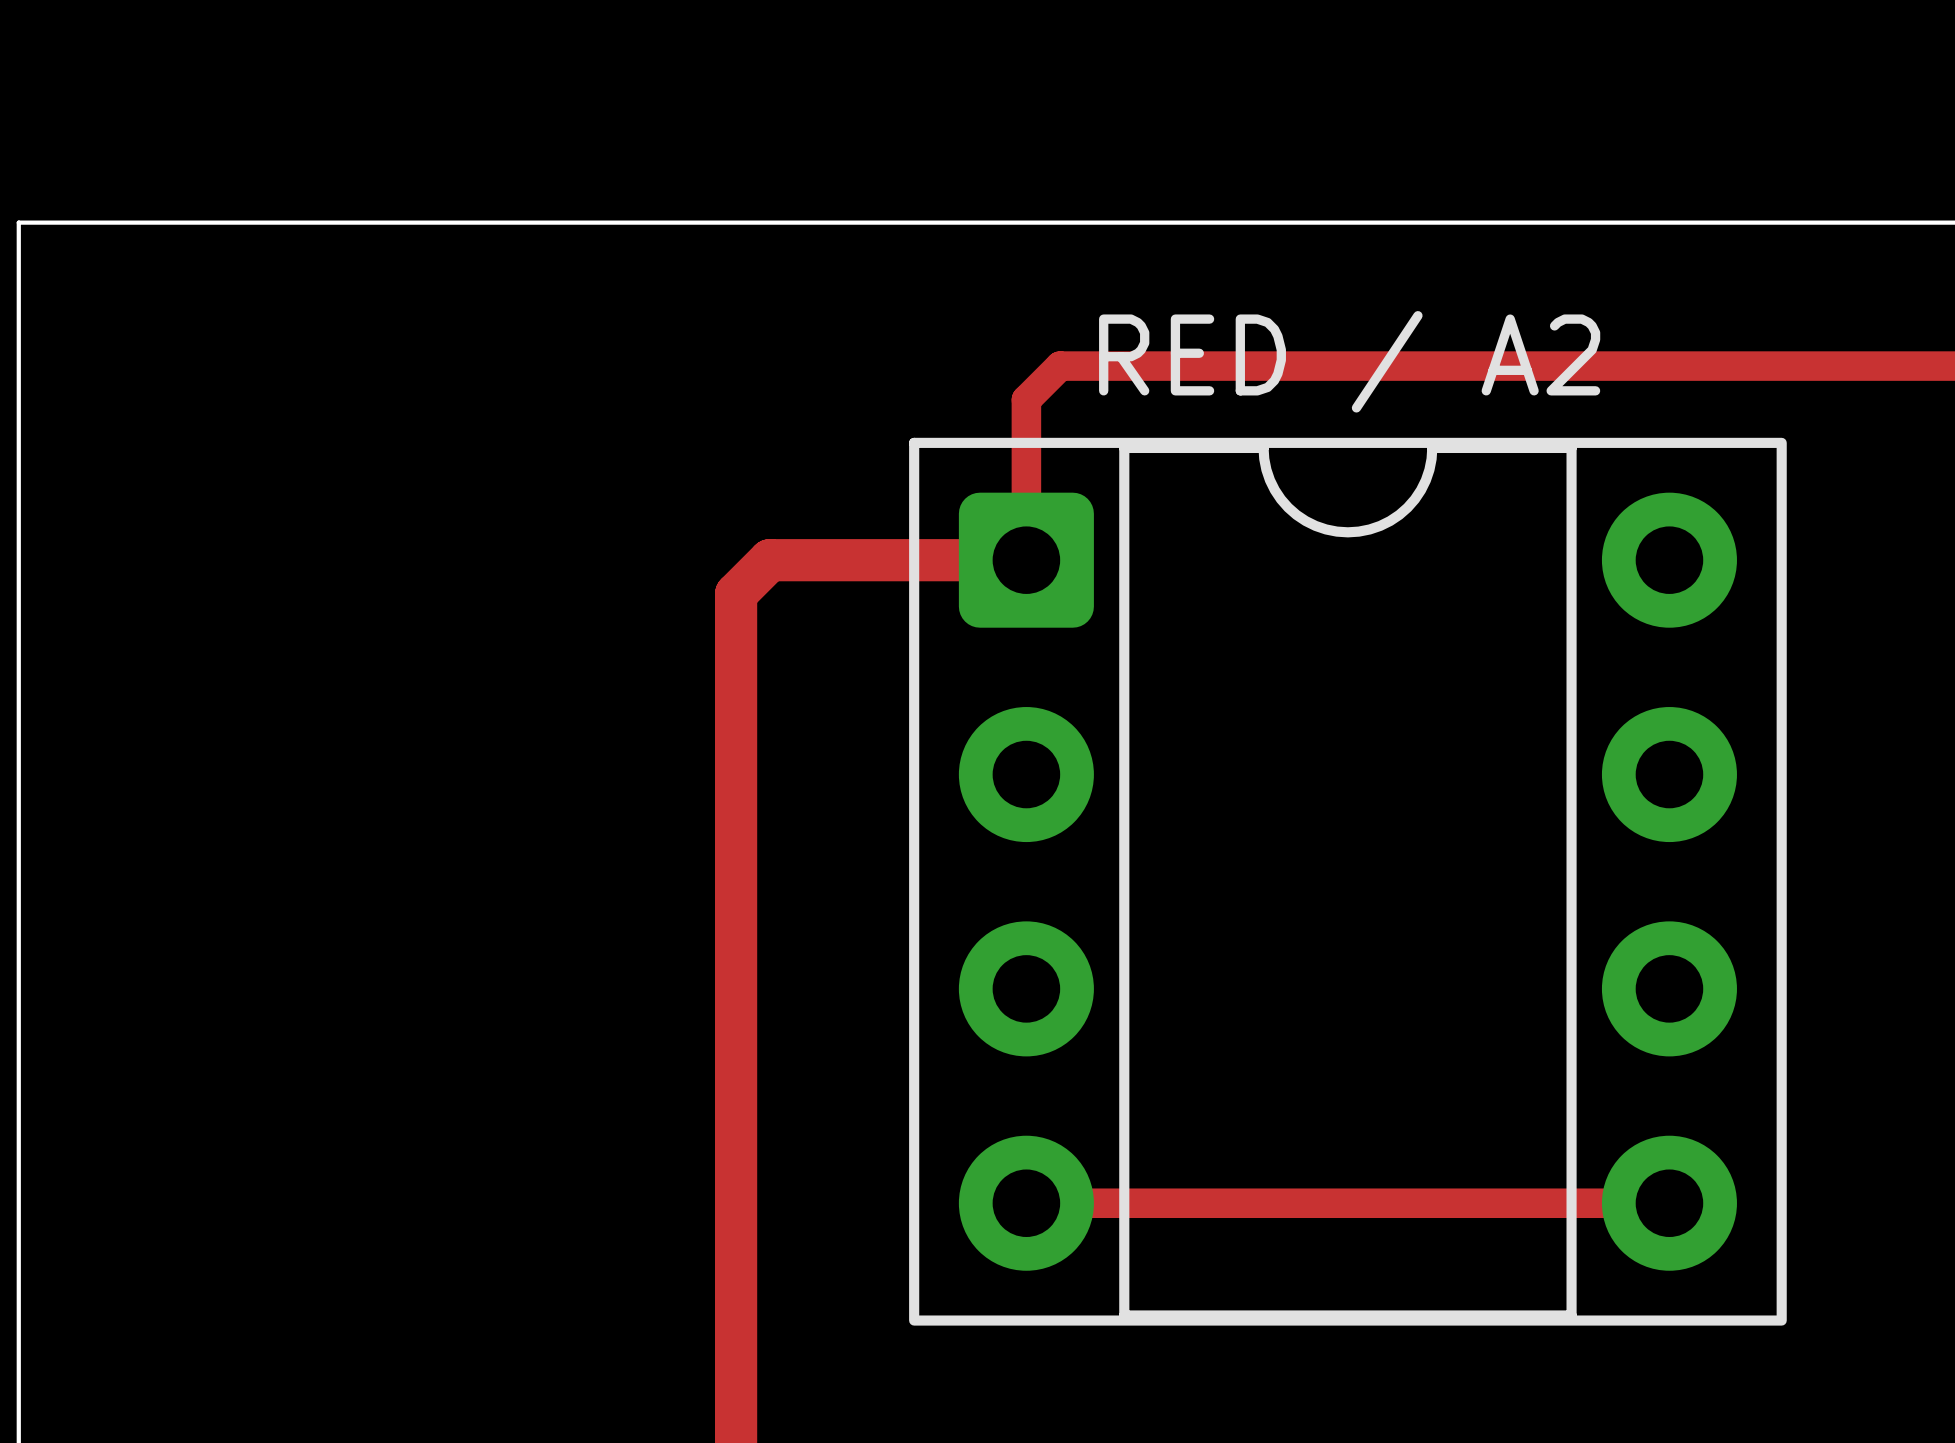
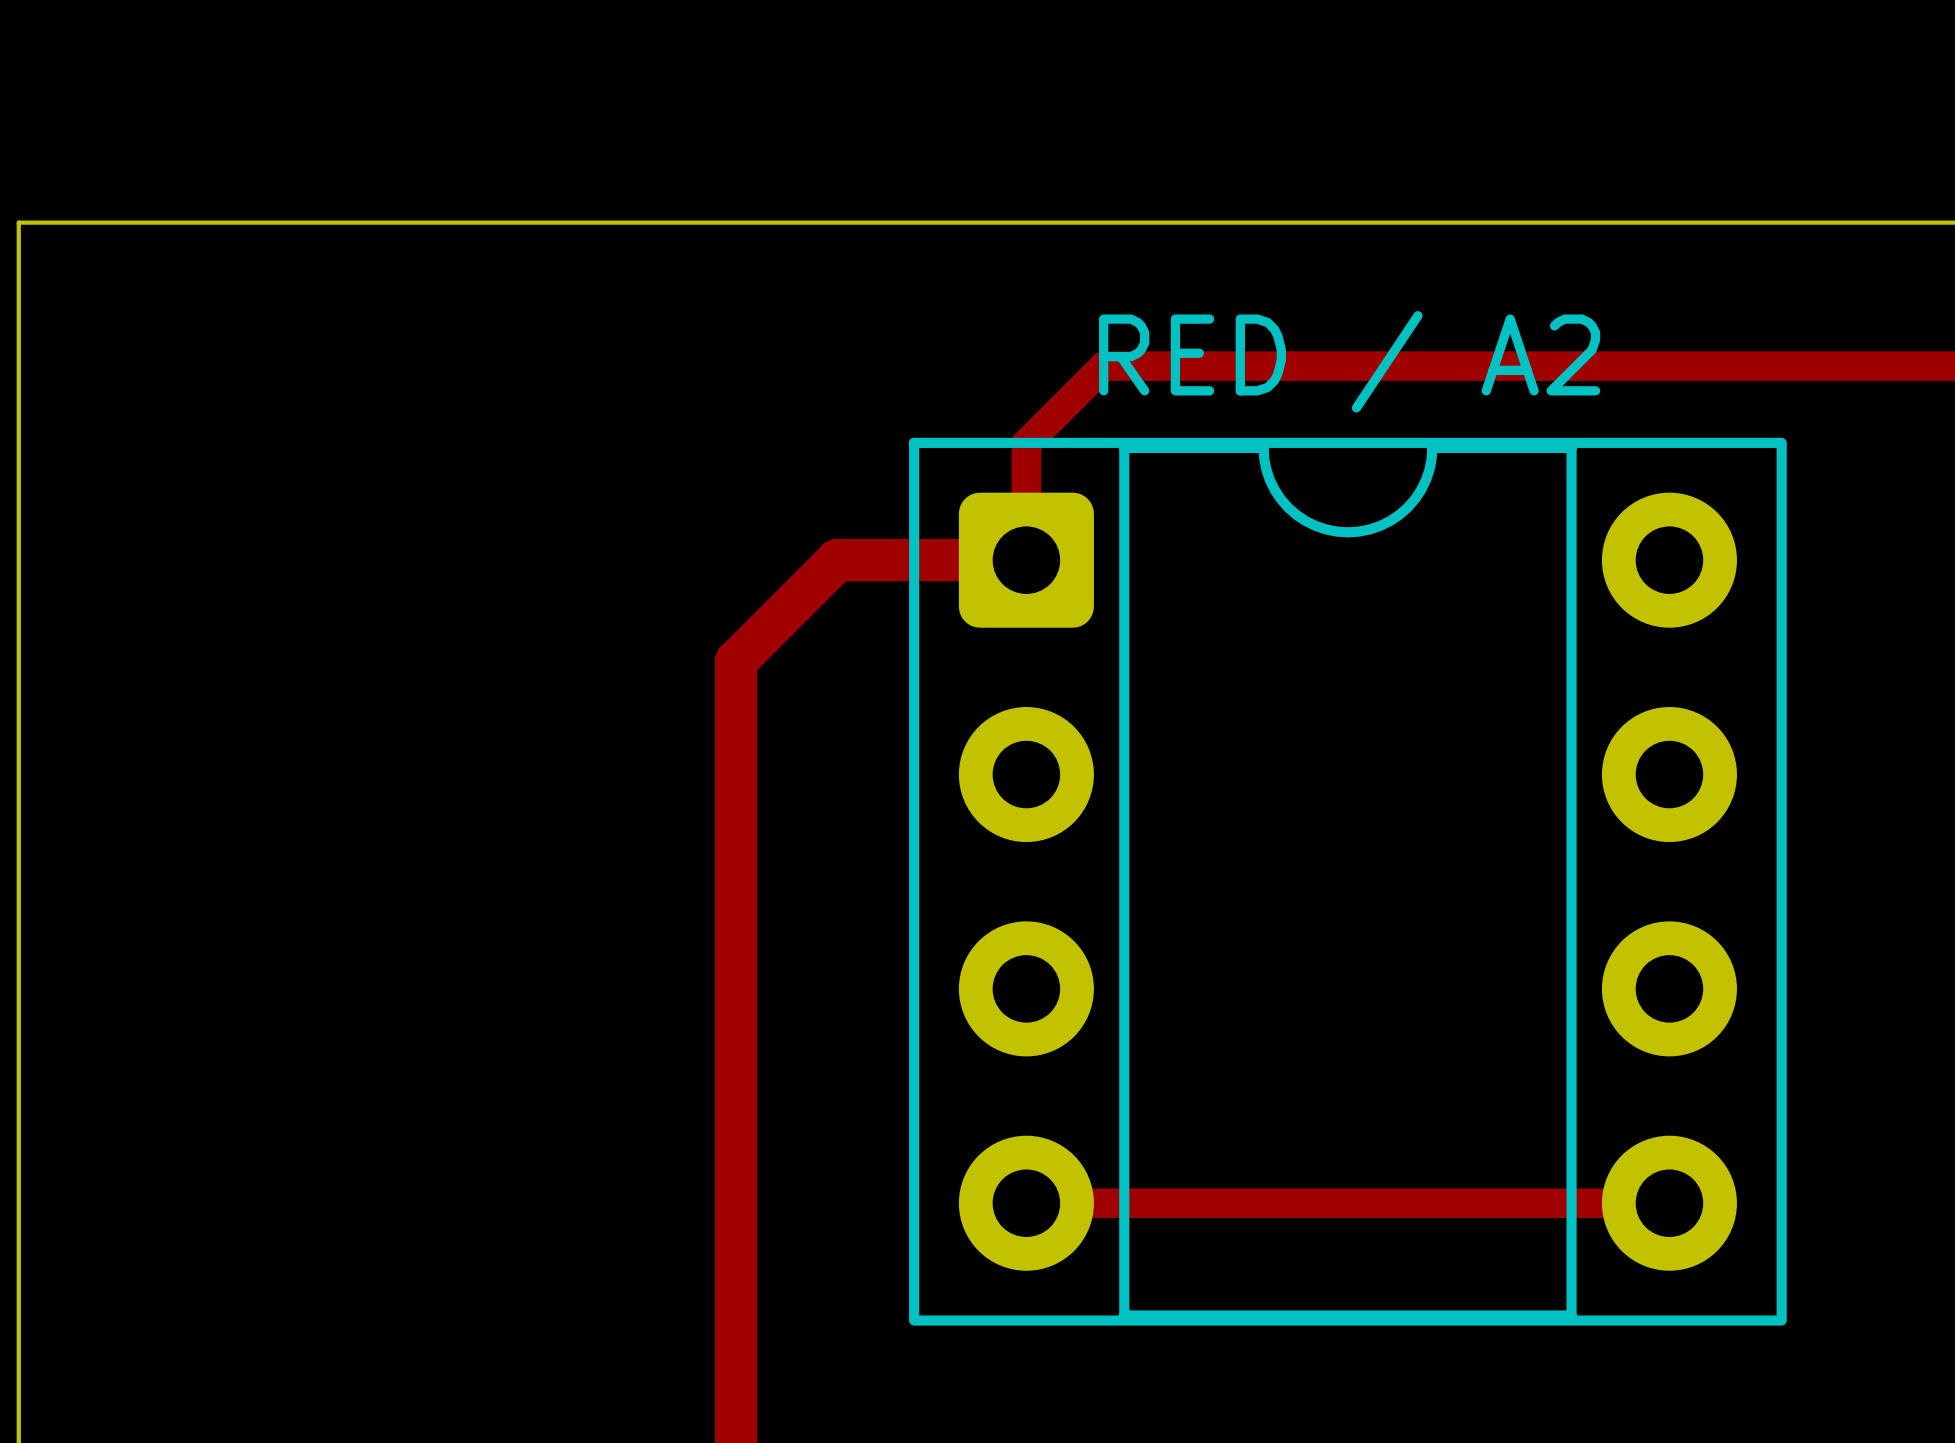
track: (1104, 366) (1060, 366) (1026, 399) (1026, 443) -> (1104, 366) (1026, 443)
track: (837, 560) (769, 560) (736, 593) (736, 661) -> (837, 560) (736, 661)

